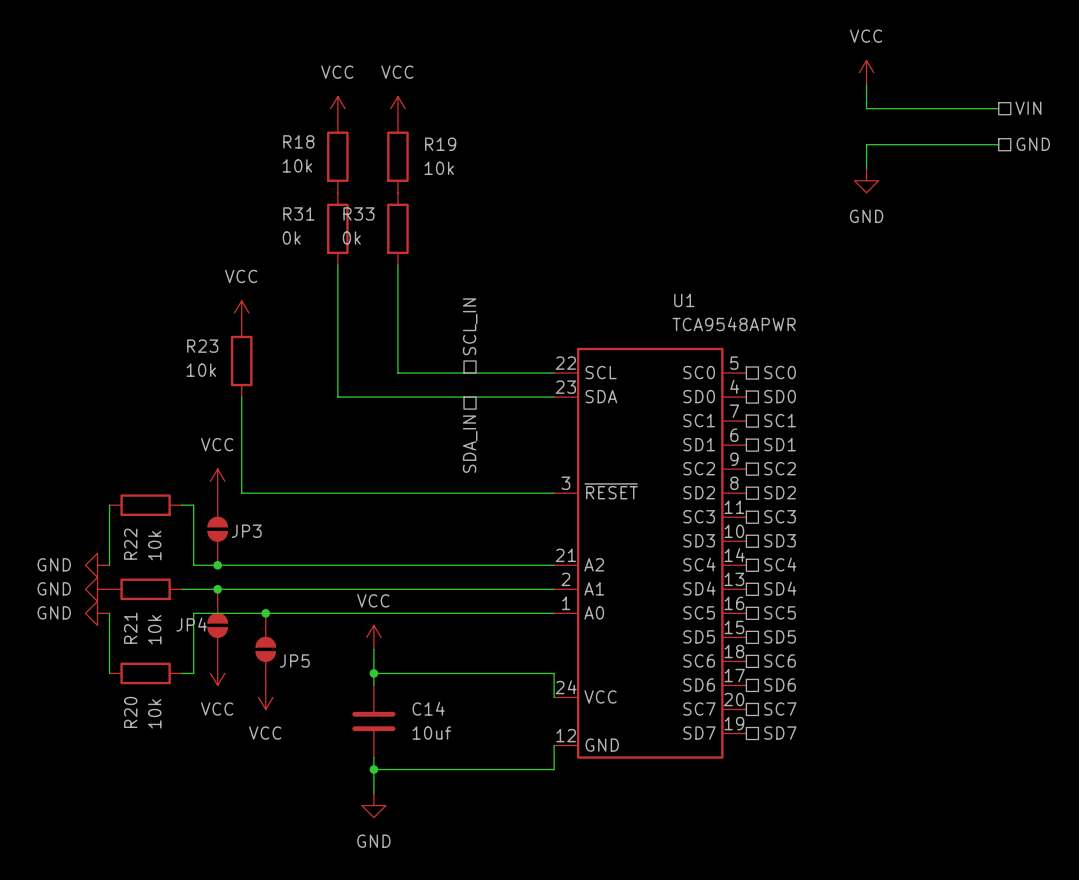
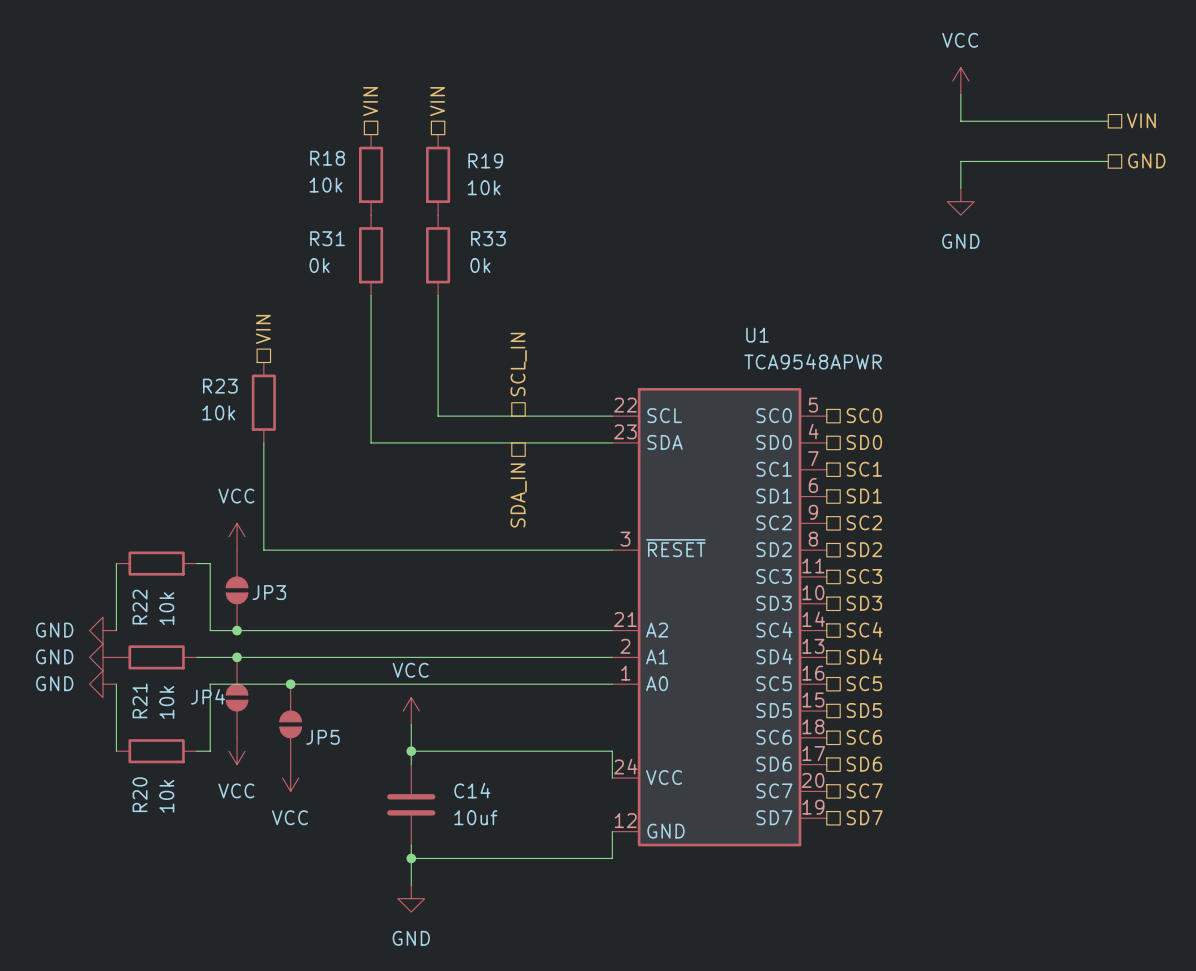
hierarchical label: none -> VIN (370, 101)
hierarchical label: none -> VIN (437, 101)
power symbol: VCC (337, 108) -> none
power symbol: VCC (397, 108) -> none
R33 name position: R33 (358, 213) -> R33 (488, 238)
R33 value position: 0k (351, 237) -> 0k (480, 265)
hierarchical label: none -> VIN (263, 329)
power symbol: VCC (241, 312) -> none

